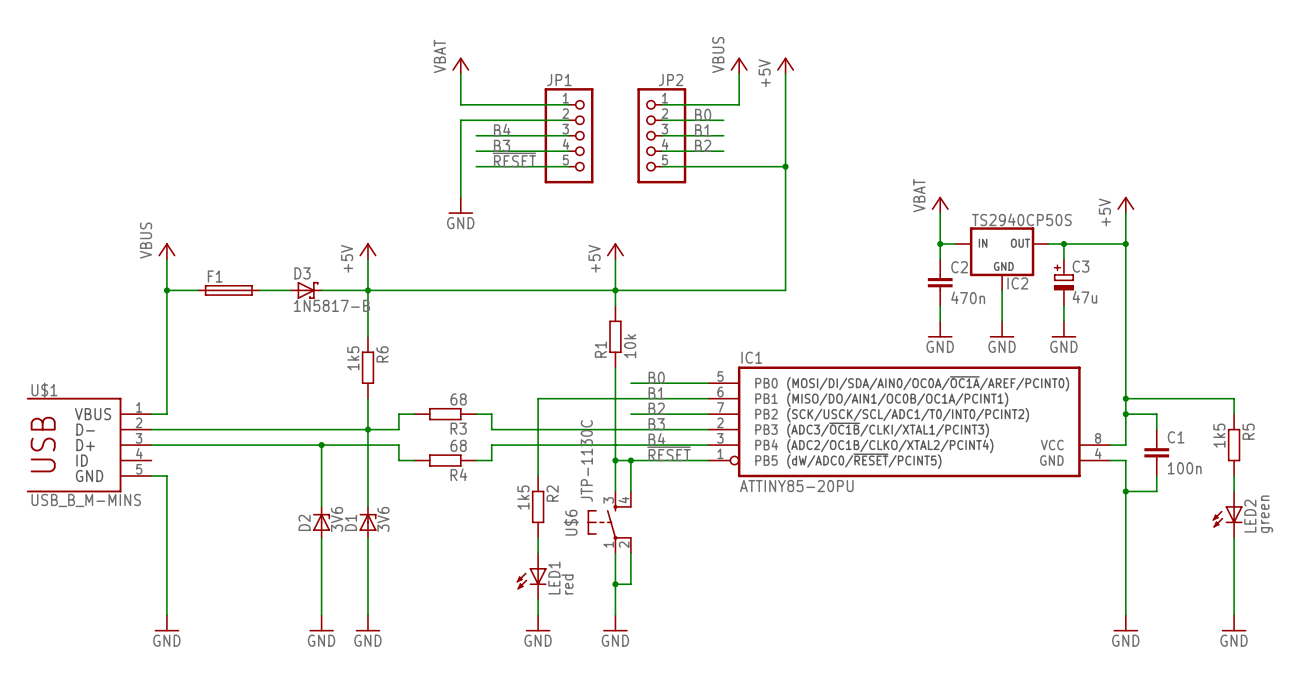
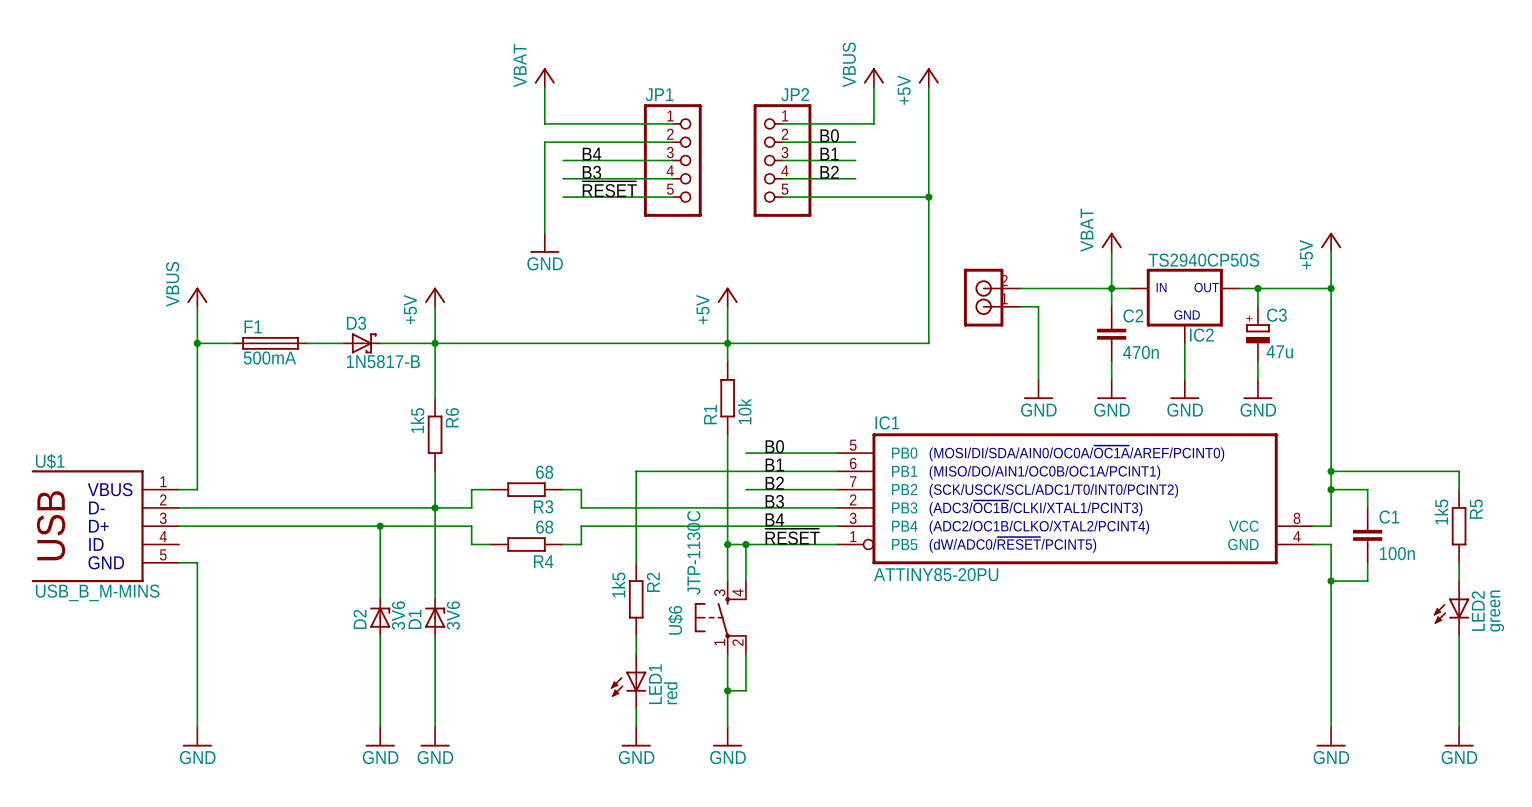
wire: none -> (1020, 288) (1111, 288)
part: none -> (992, 297)
wire: none -> (1020, 306) (1038, 306) (1038, 379)
F1 value: none -> 500mA (269, 357)
power symbol: none -> GND (1038, 389)

